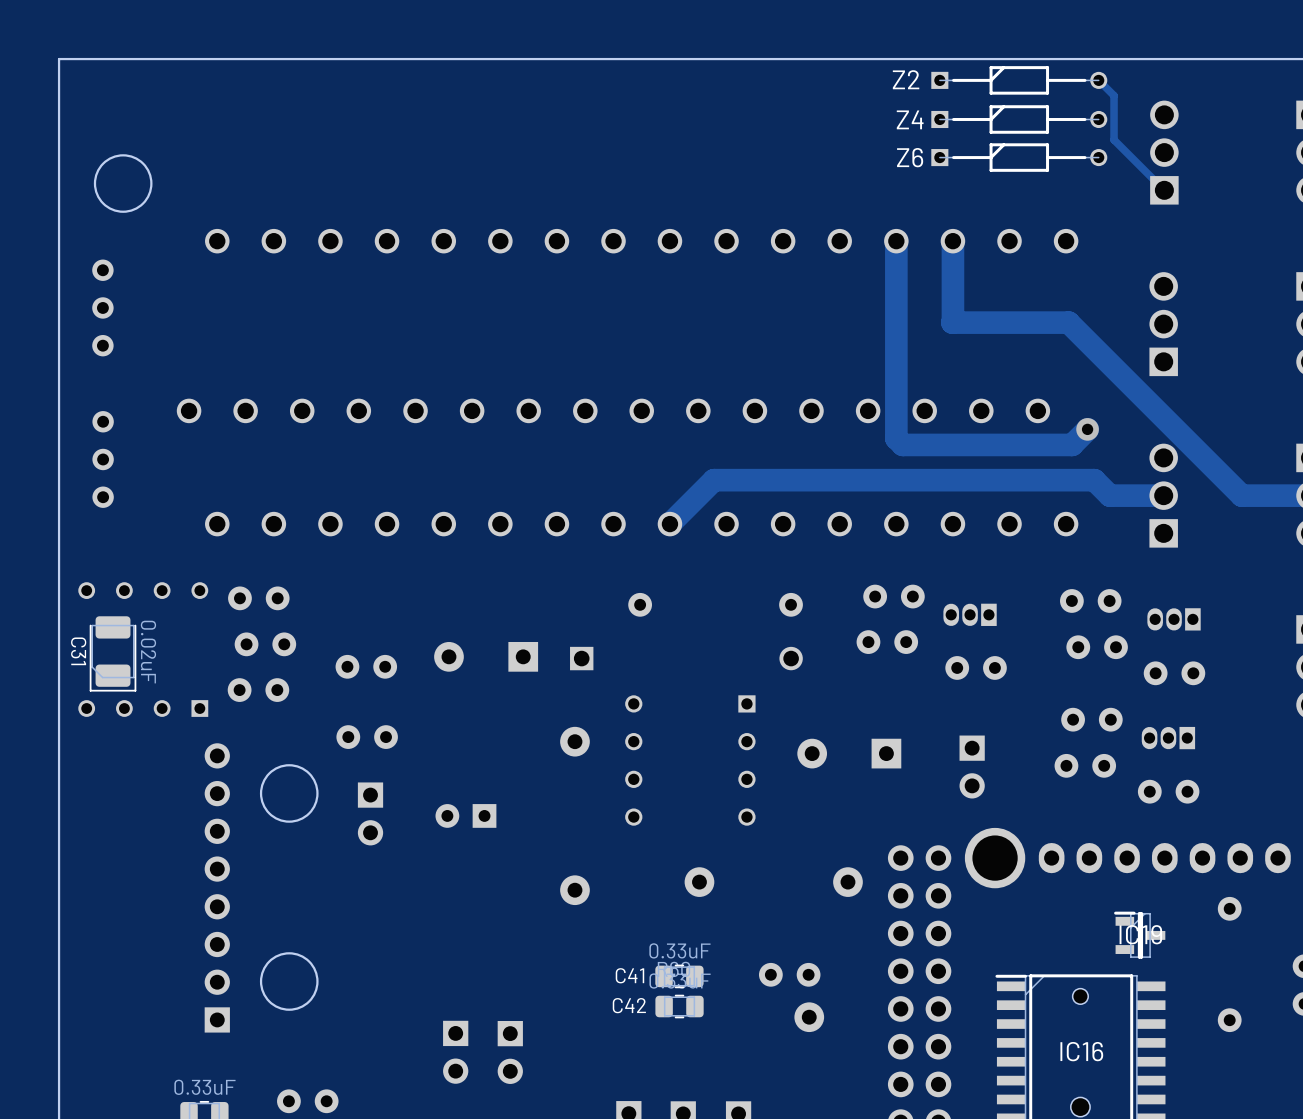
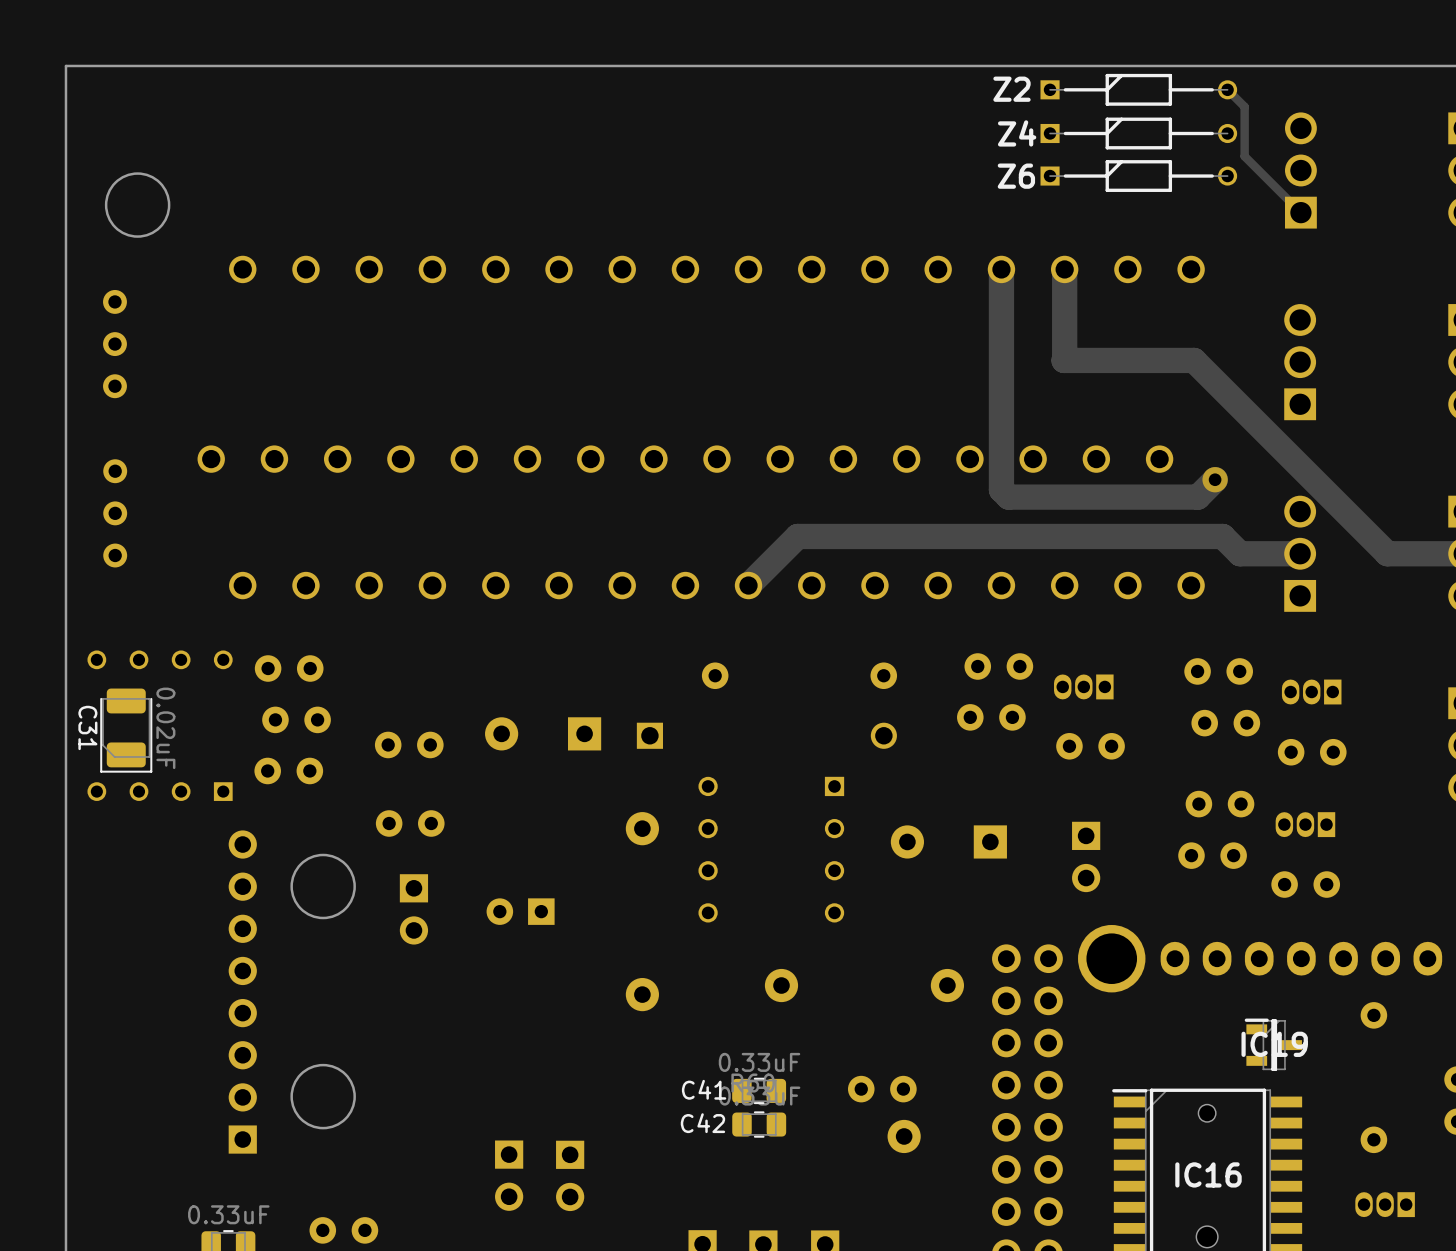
part: none -> (1385, 1204)

